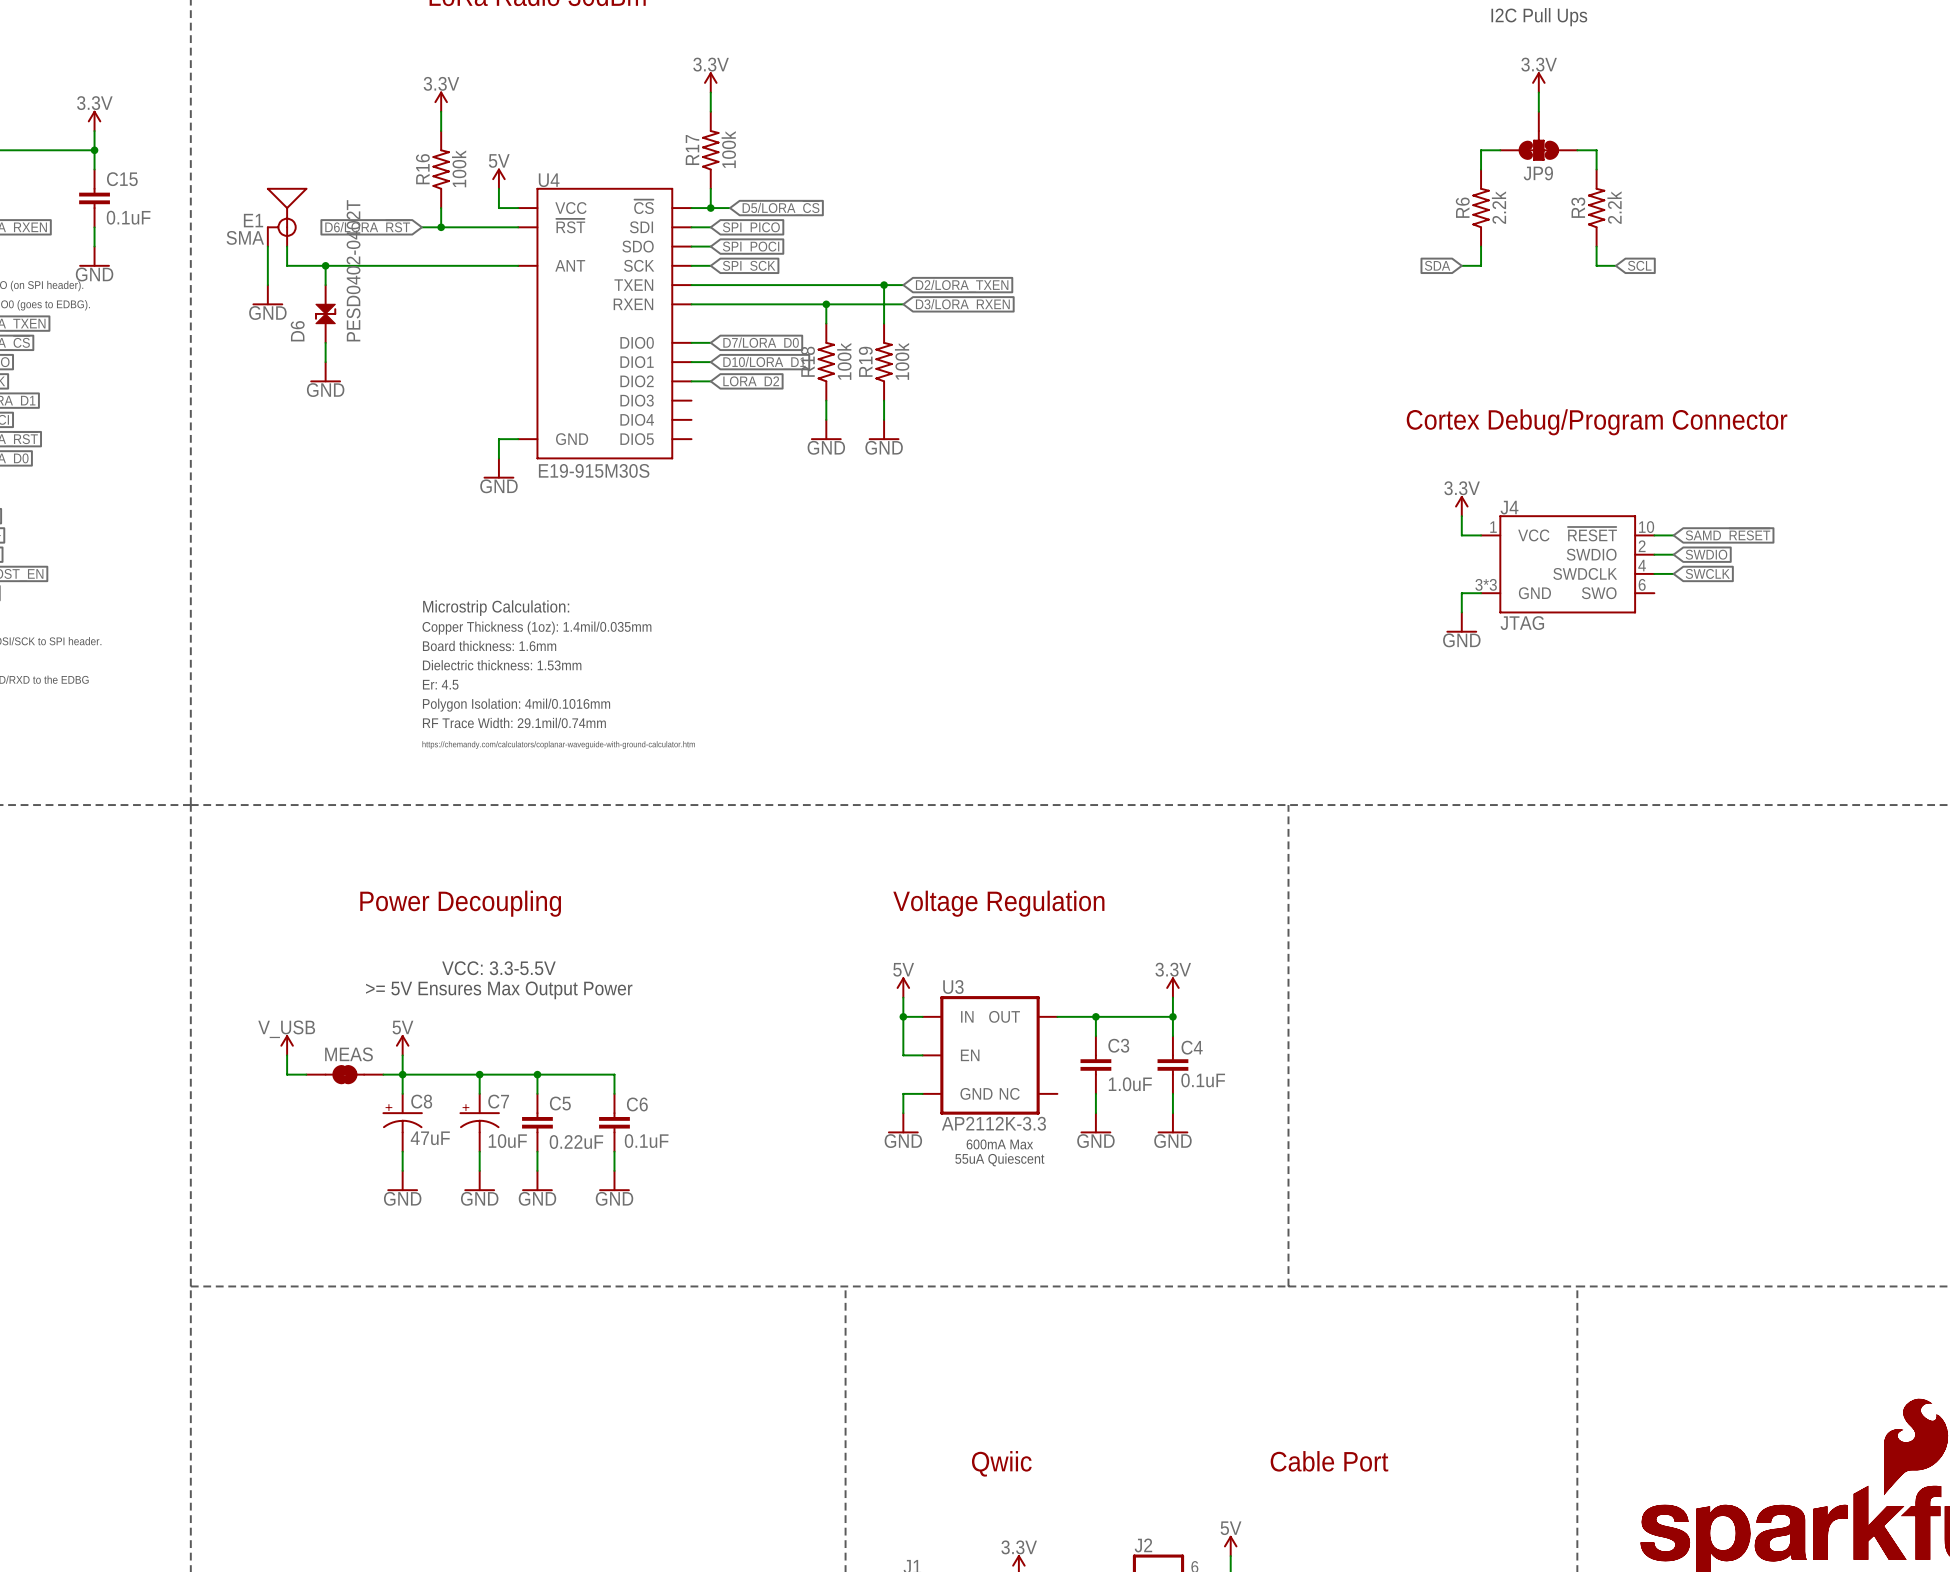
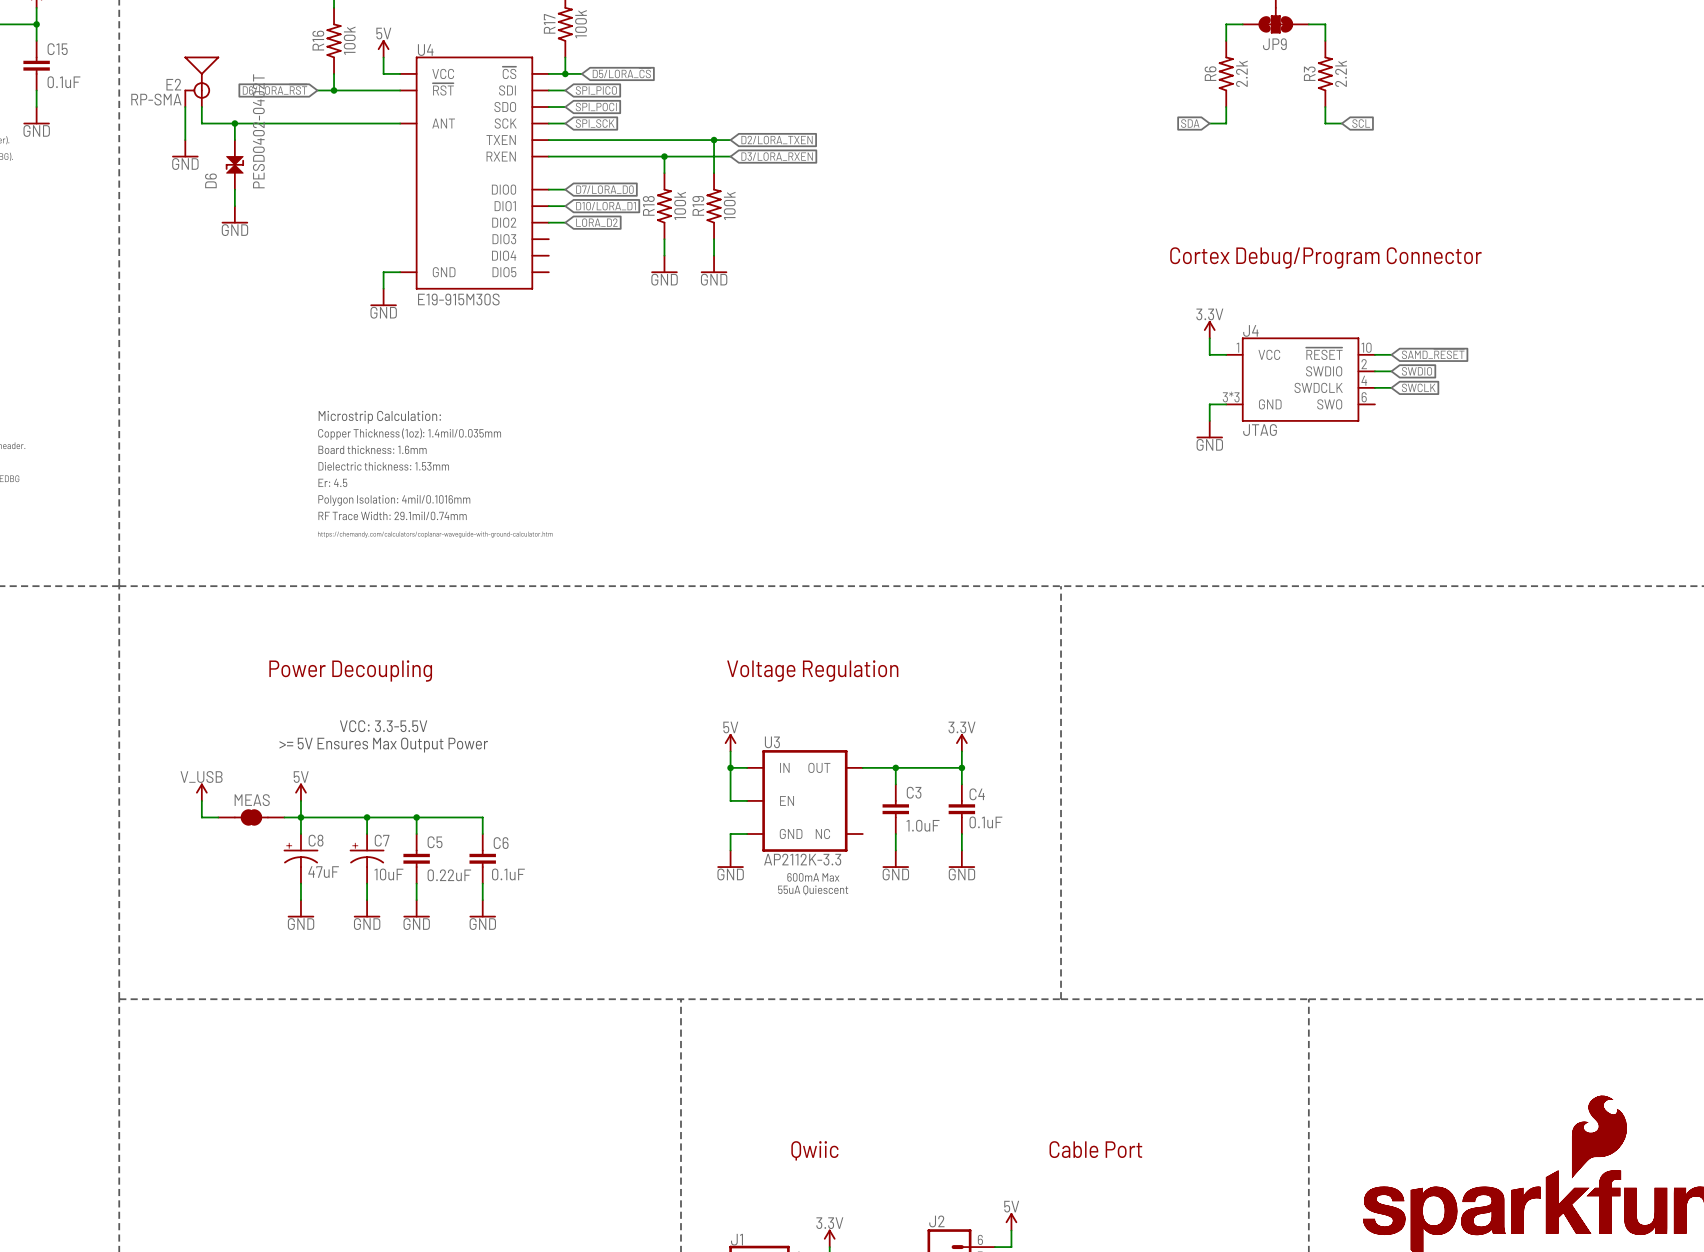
E1 name: E1 (253, 220) -> E2 (173, 84)
E1 value: SMA (245, 237) -> RP-SMA (156, 99)

